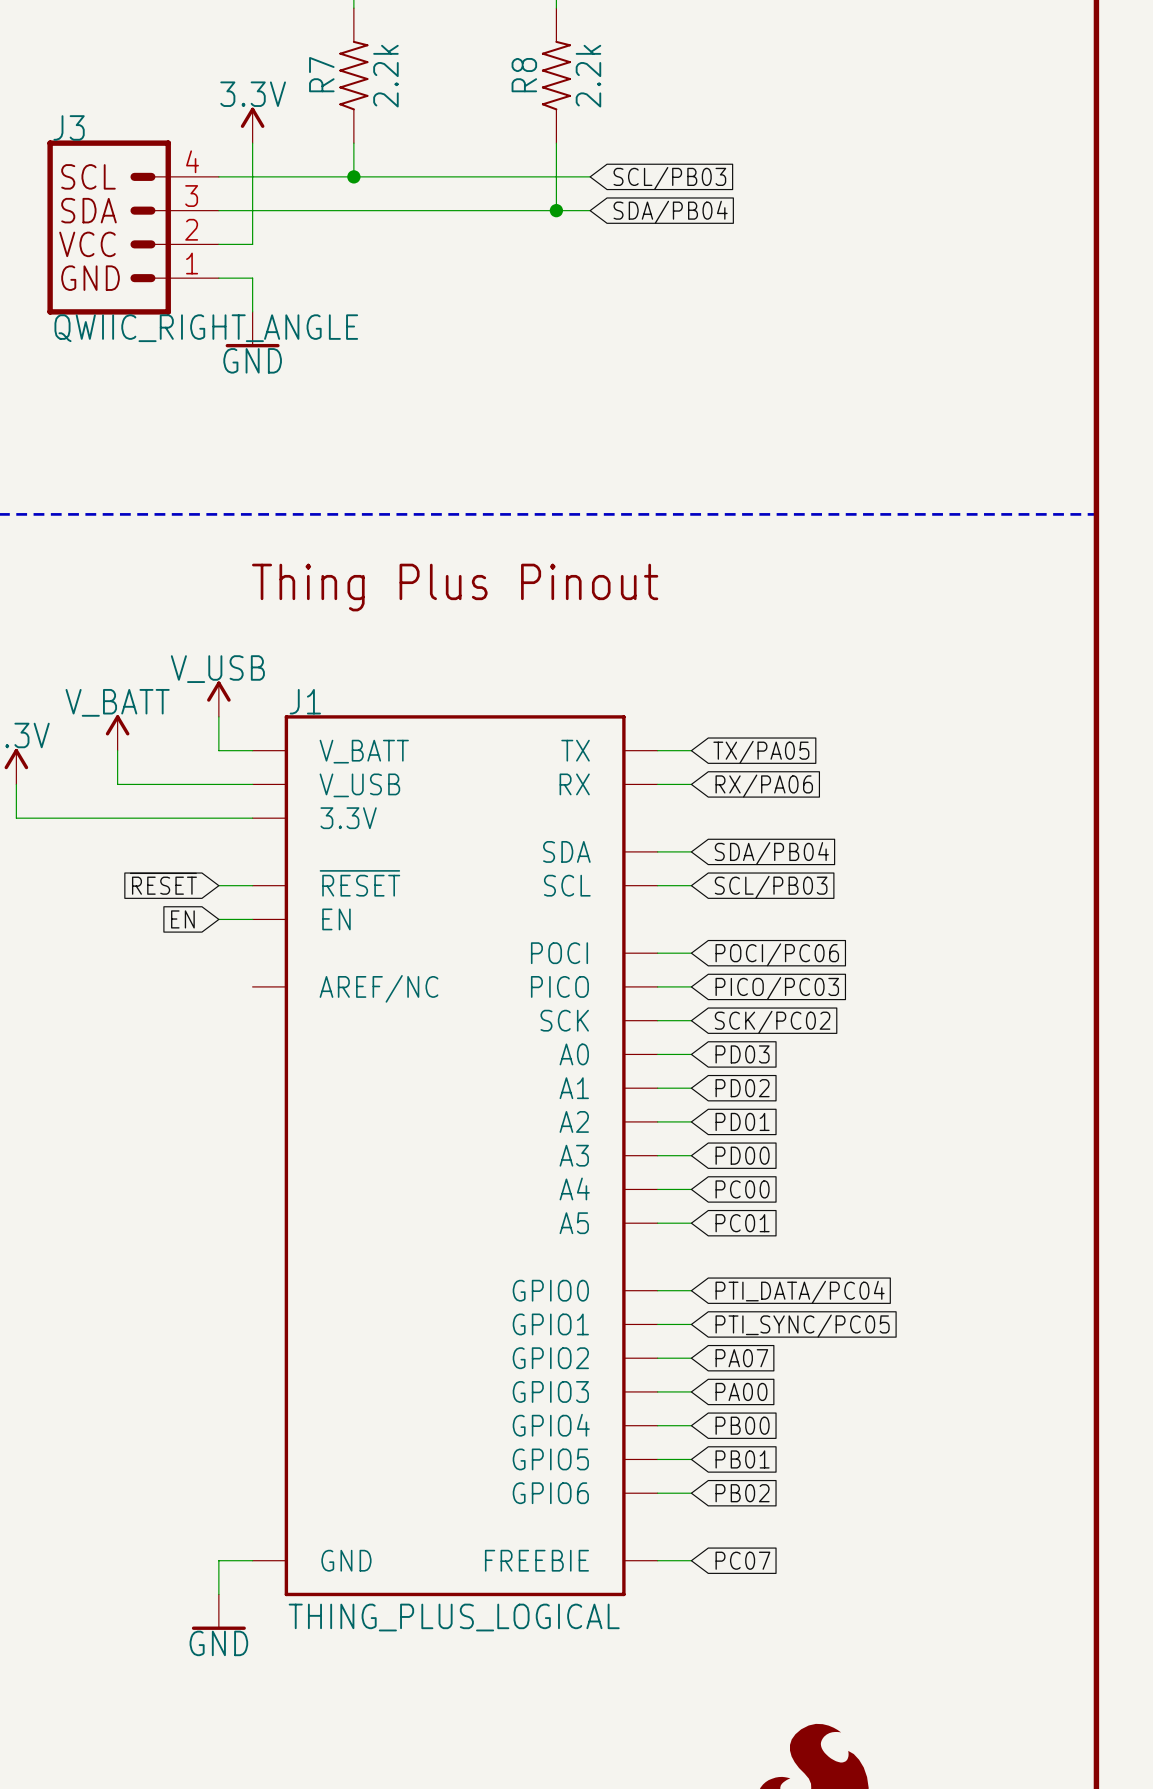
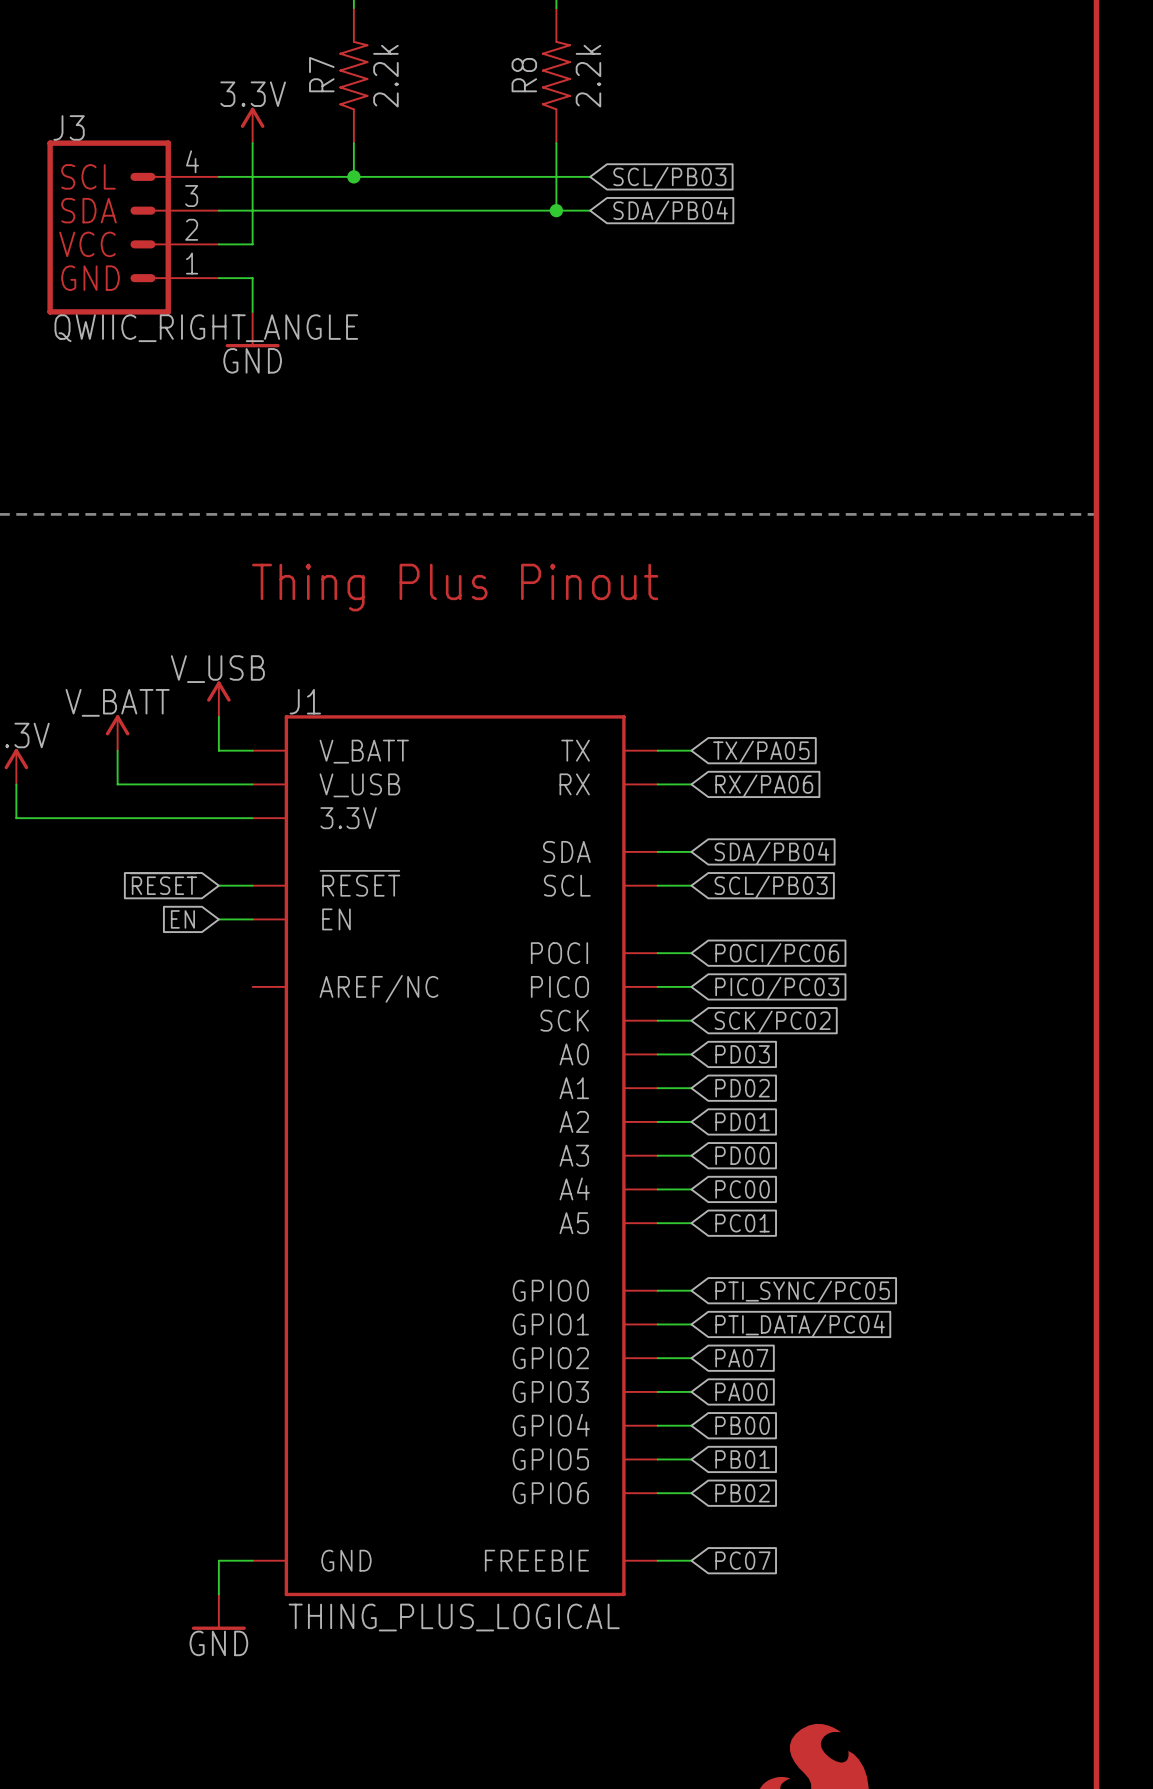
global label: PTI_DATA/PC04 (800, 1292) -> PTI_SYNC/PC05 (802, 1292)
global label: PTI_SYNC/PC05 (802, 1326) -> PTI_DATA/PC04 (800, 1326)

